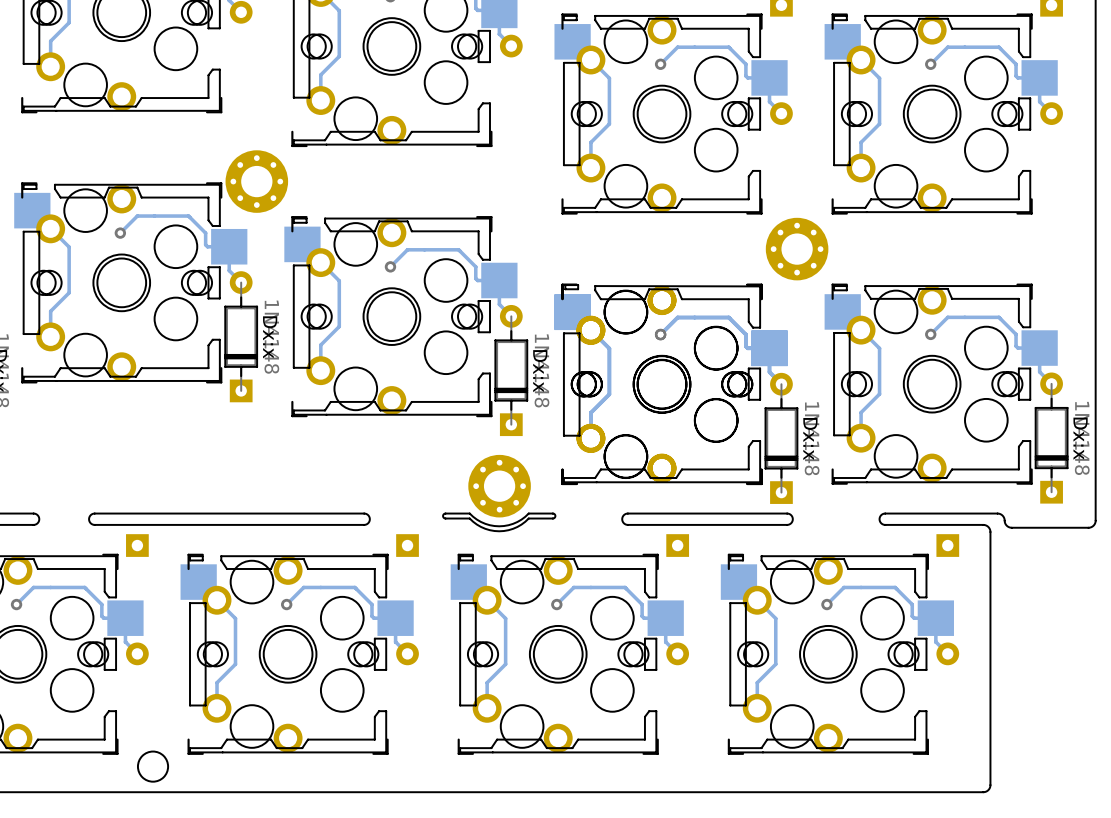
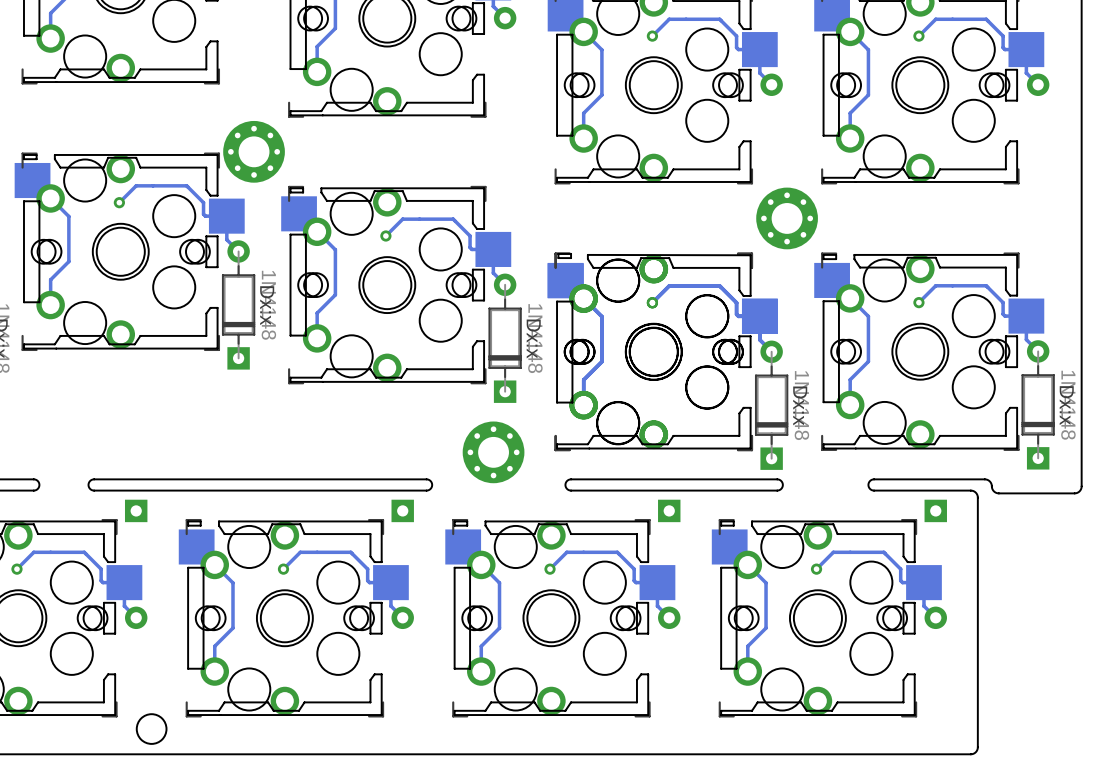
board edge: (364, 513) (368, 515) (369, 519) (368, 523) (364, 524) -> (359, 479) (427, 479) (432, 484) (427, 490) (359, 490)
board edge: (552, 513) (528, 513) (513, 523) (499, 526) (485, 523) (469, 513) (445, 513) (443, 516) (445, 518) (469, 518) (481, 526) (499, 531) (513, 528) (528, 518) (553, 518) (555, 515) (552, 513) -> none
board edge: (627, 513) (623, 515) (622, 519) (623, 523) (627, 524) -> (620, 479) (570, 479) (565, 484) (570, 490) (620, 490)

